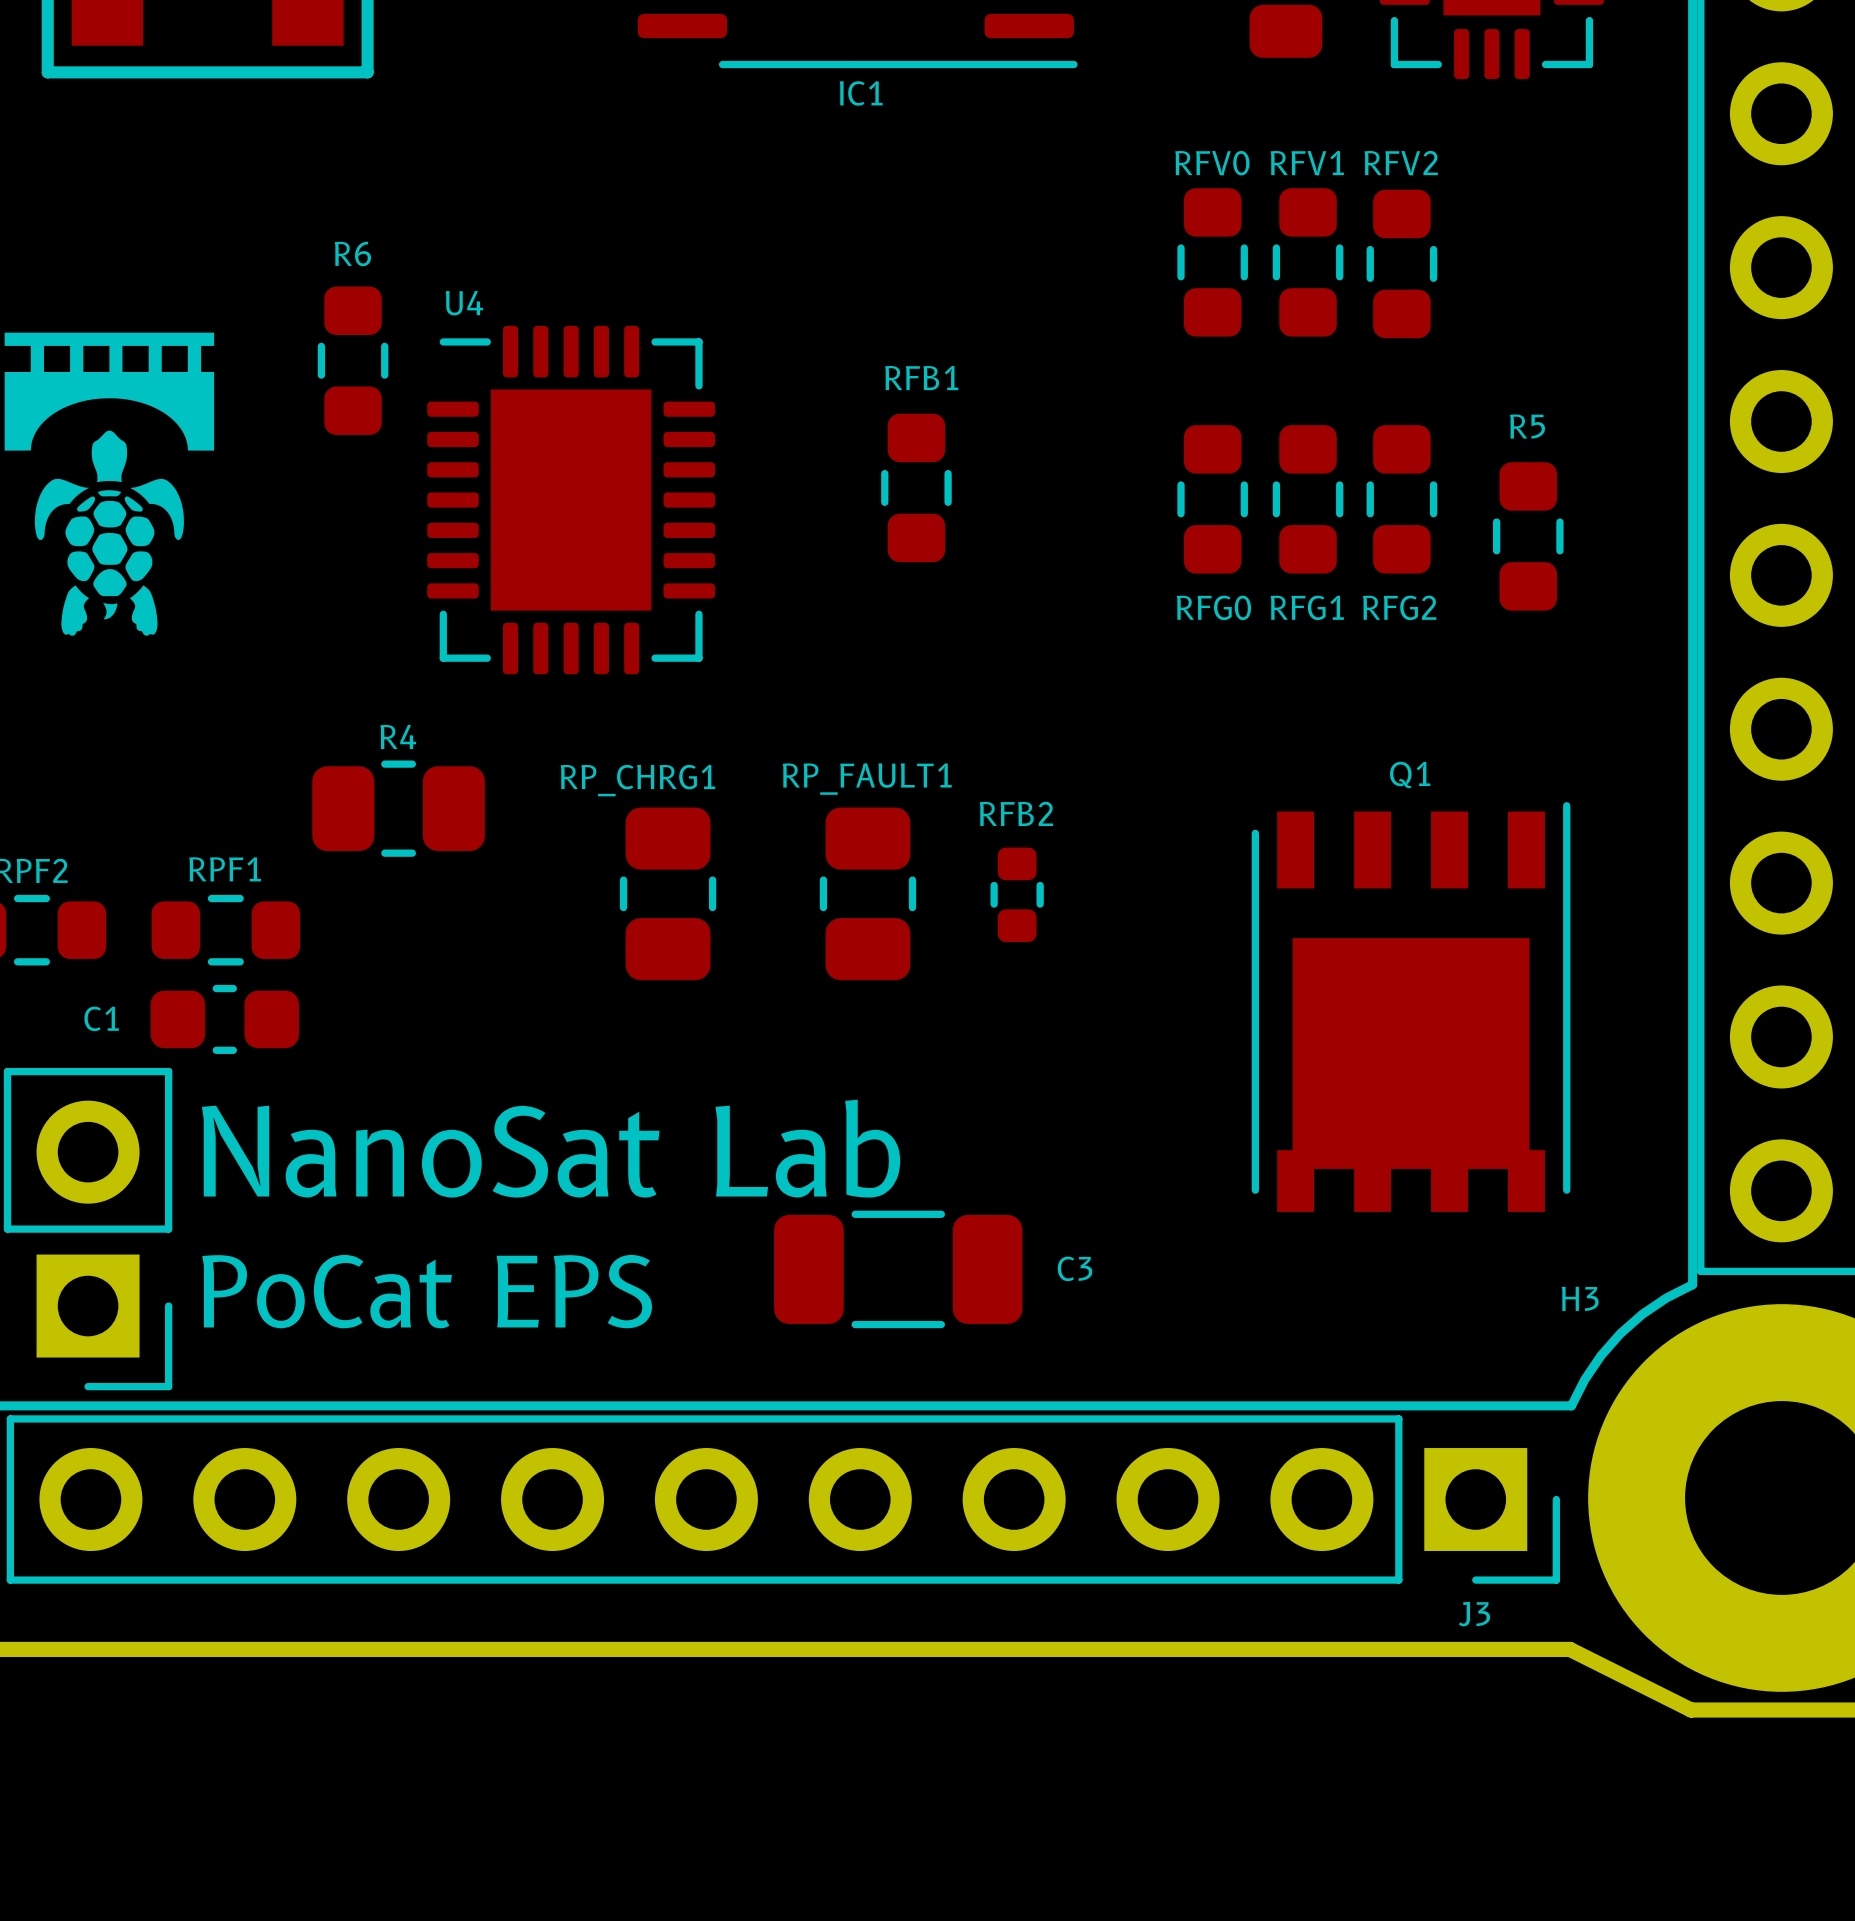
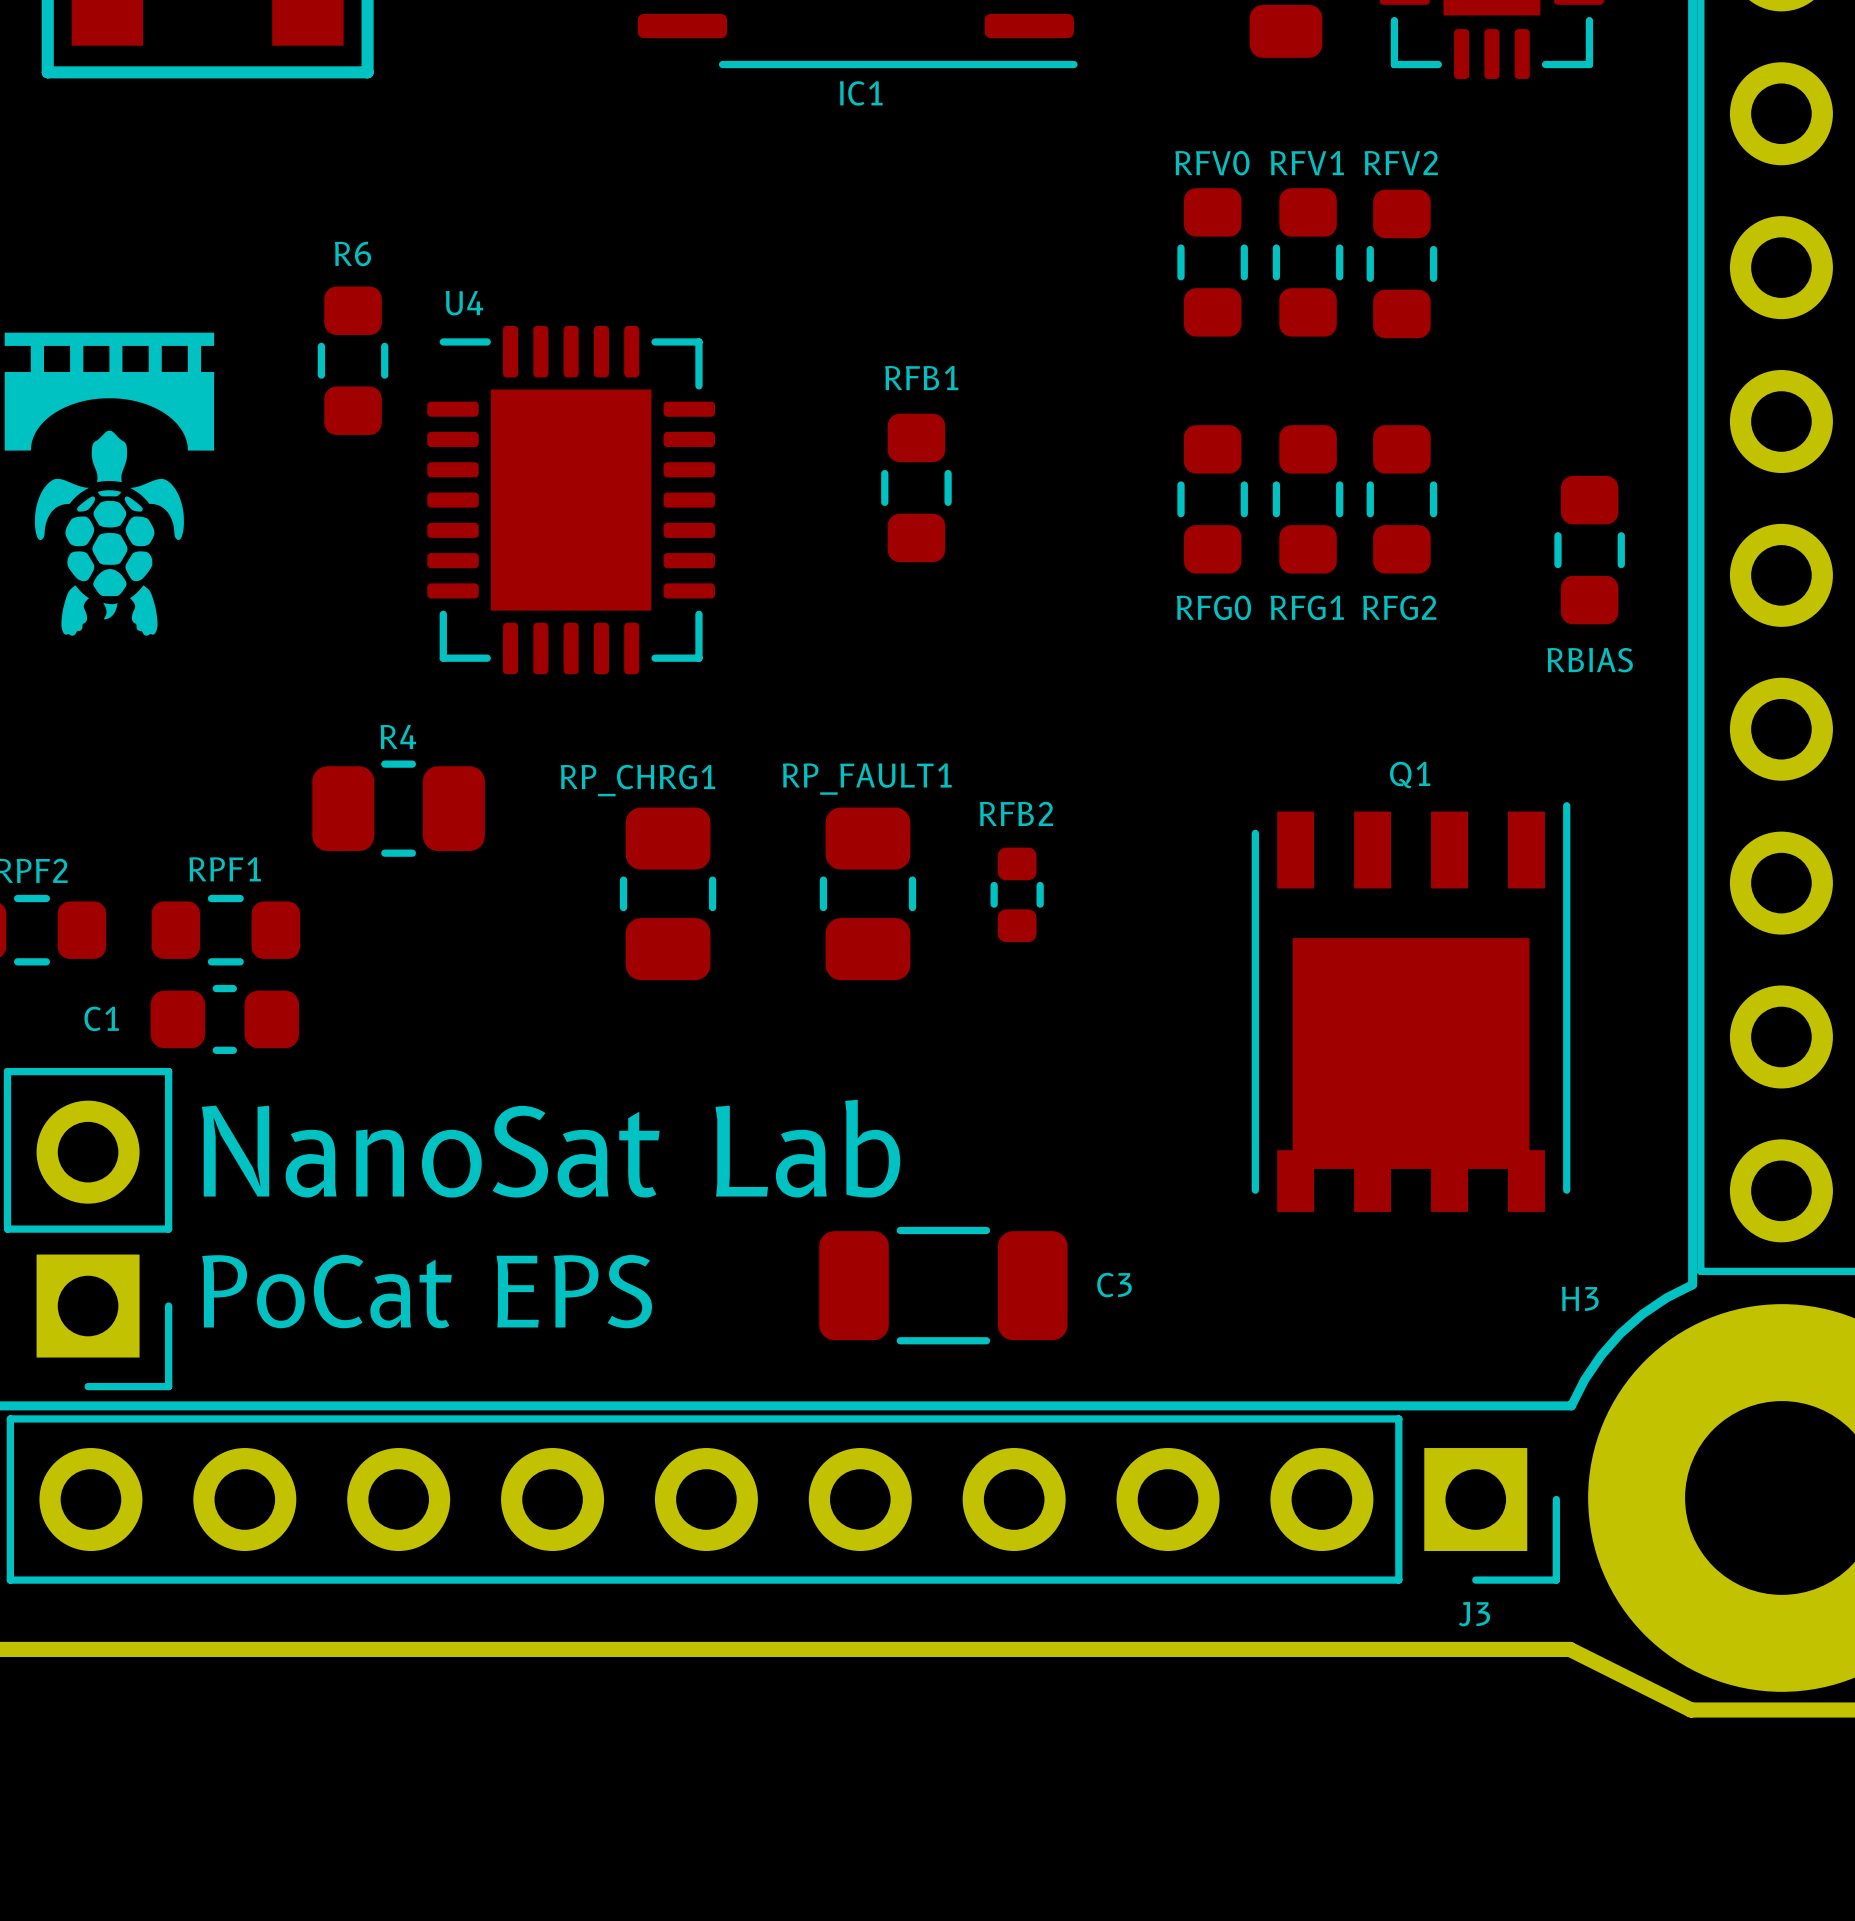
R5: (1528, 536) -> none
part: none -> (1589, 550)
text: none -> RBIAS (1590, 660)
C3 name position: C3 (1075, 1268) -> C3 (1114, 1285)
C3 position: (898, 1269) -> (943, 1285)

